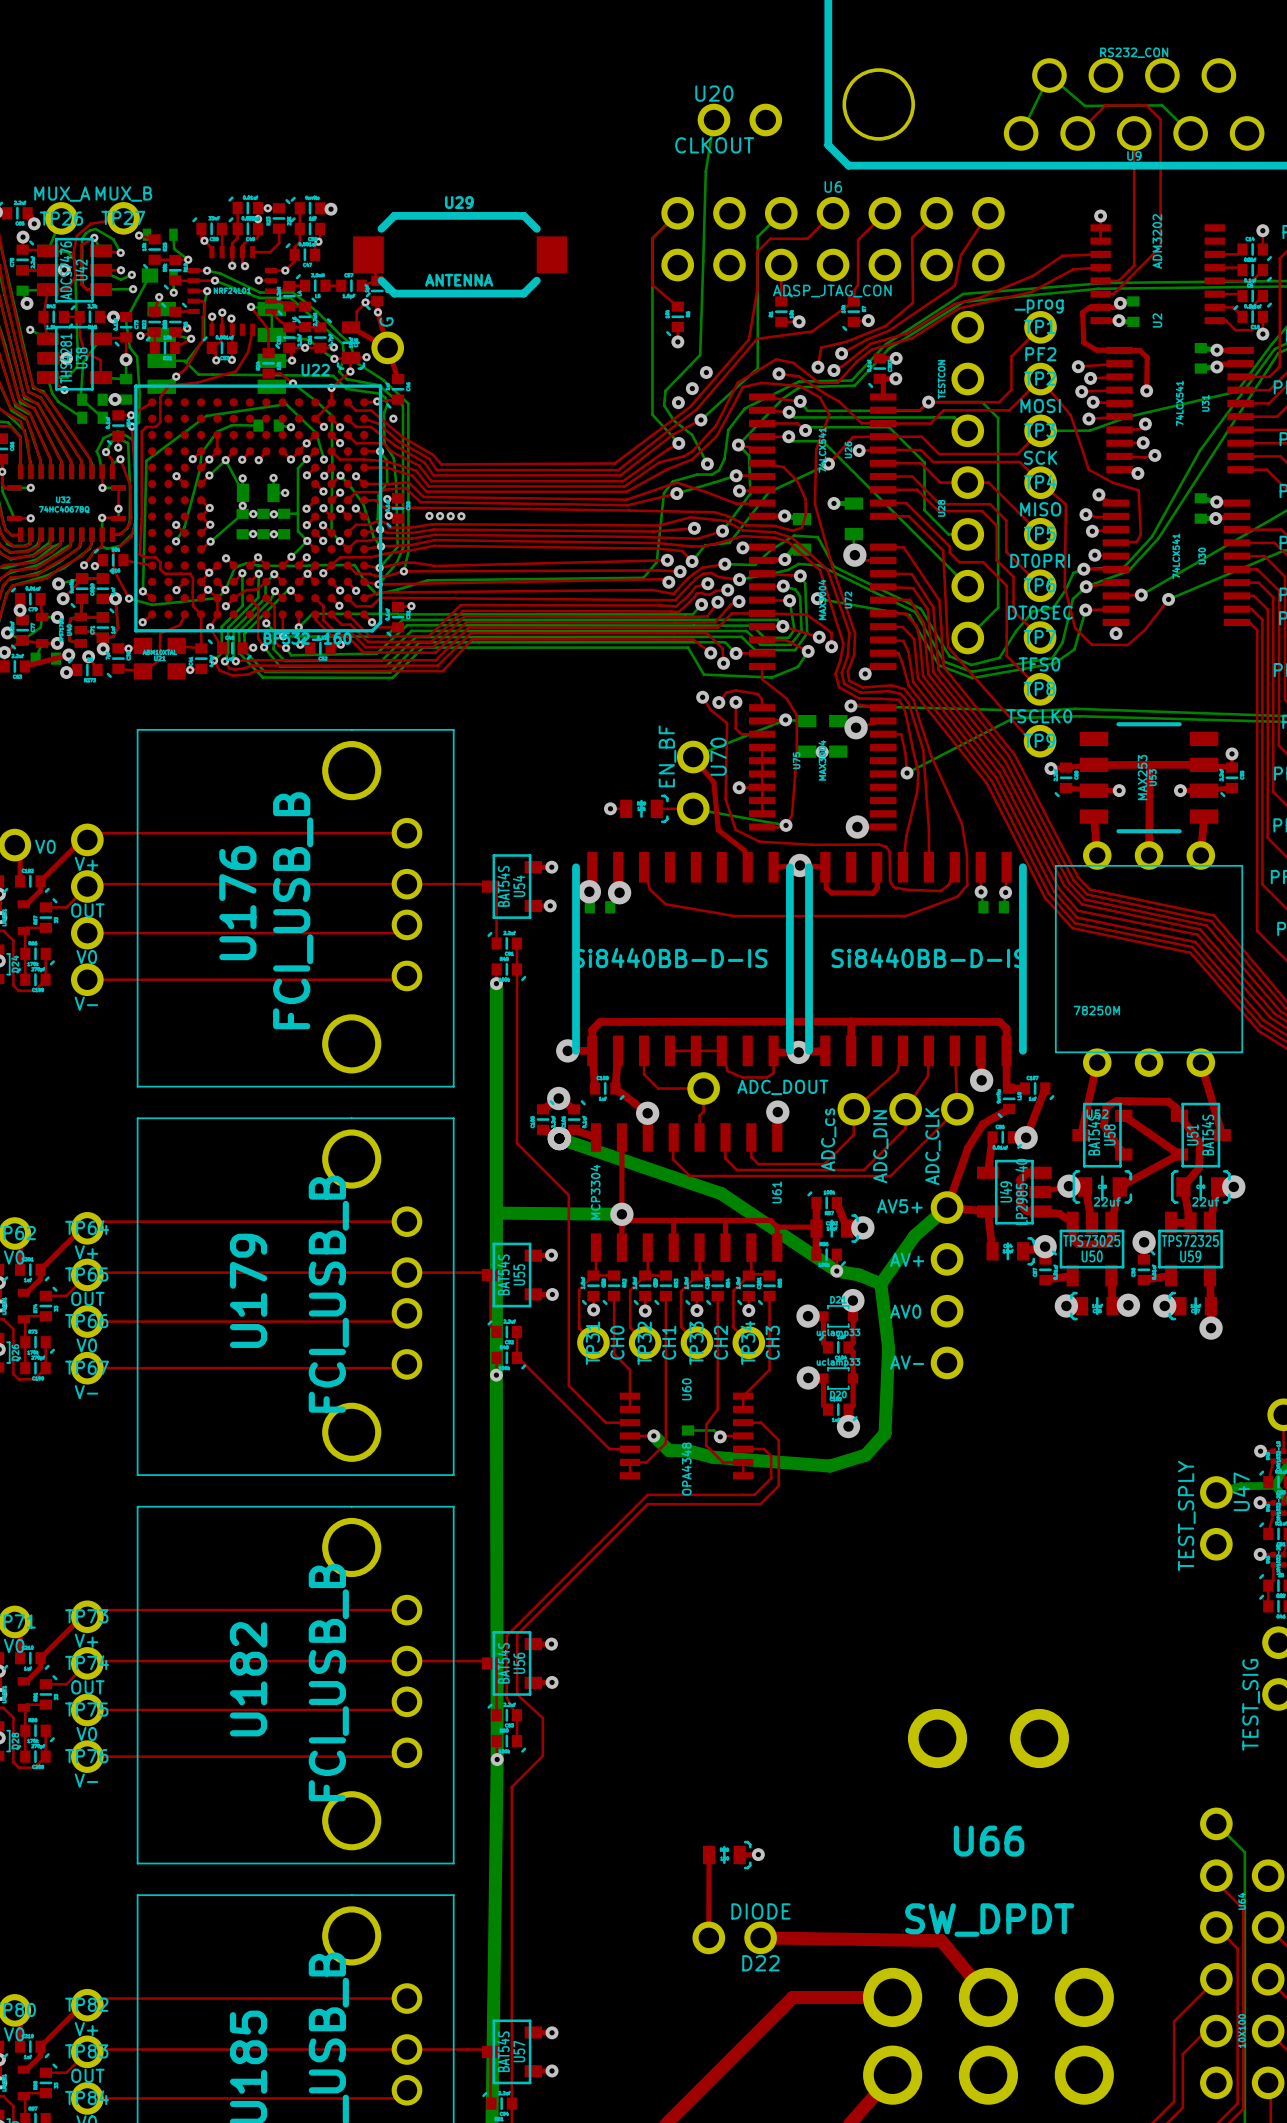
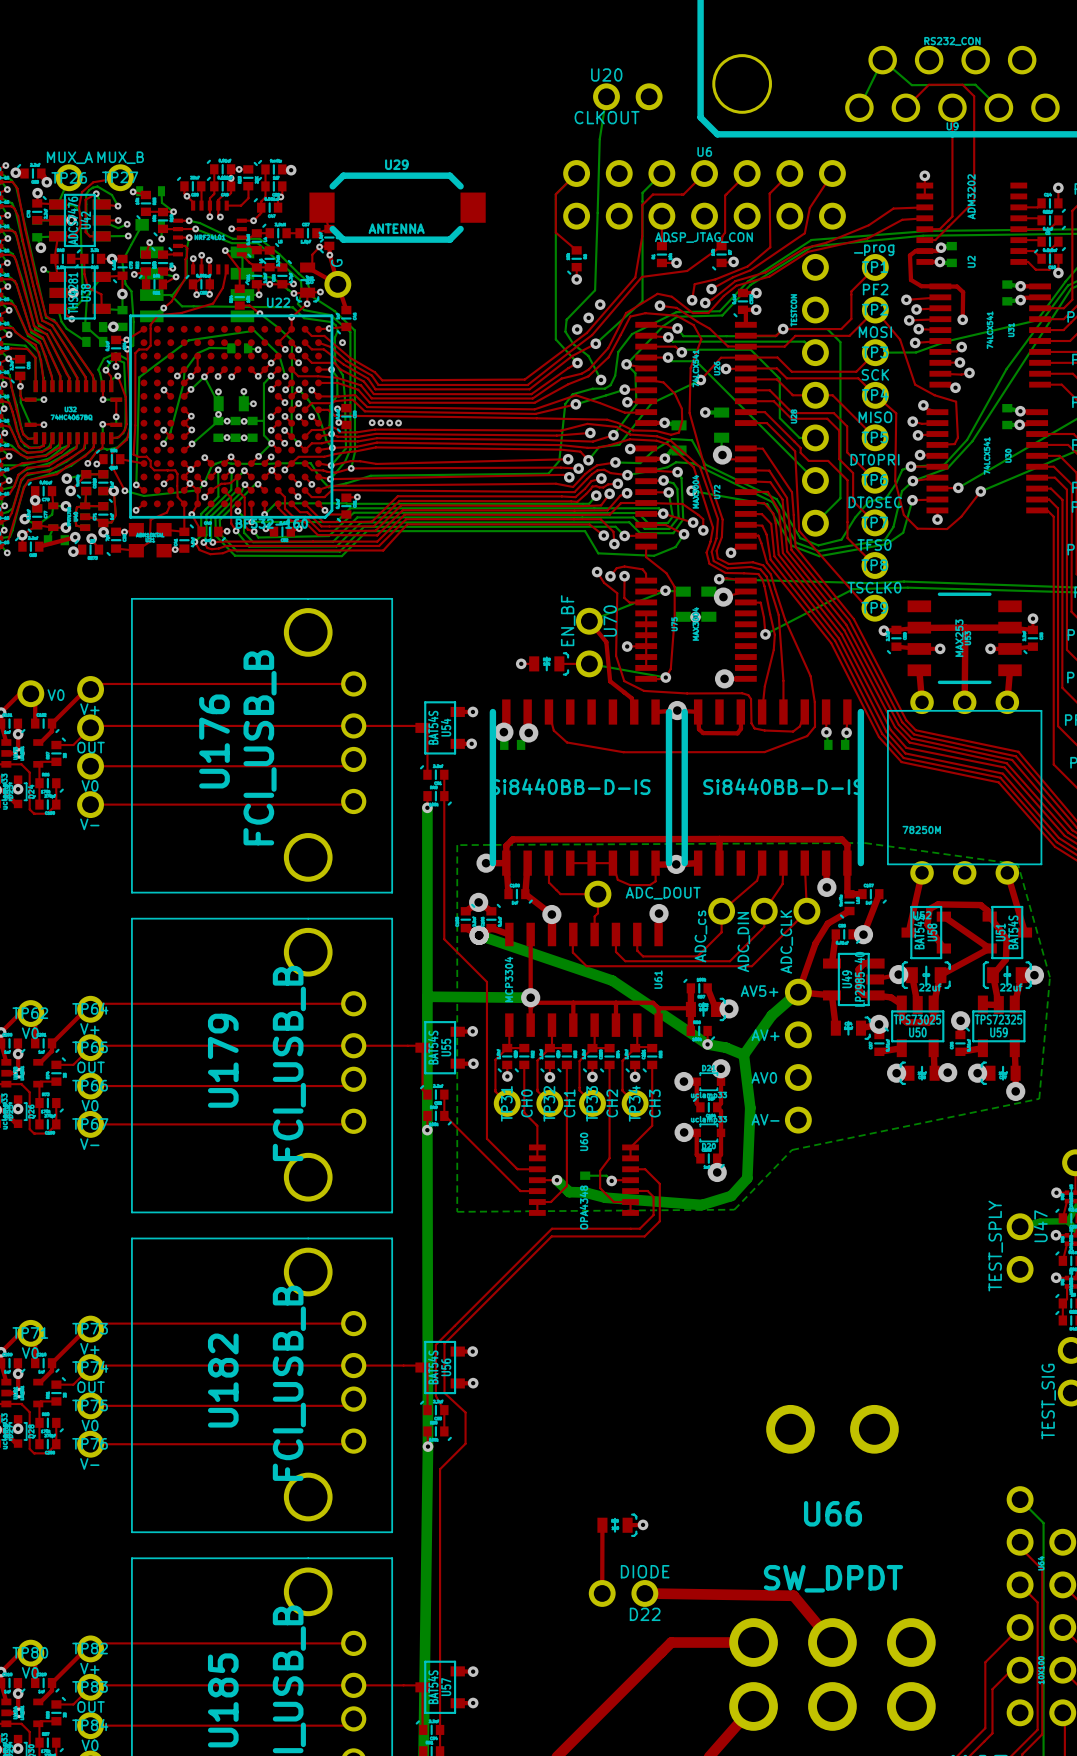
bottom zone outline: none -> (864, 842) (1017, 864) (1049, 977) (1039, 1098) (791, 1150) (734, 1209) (457, 1211) (457, 845) (864, 842)

